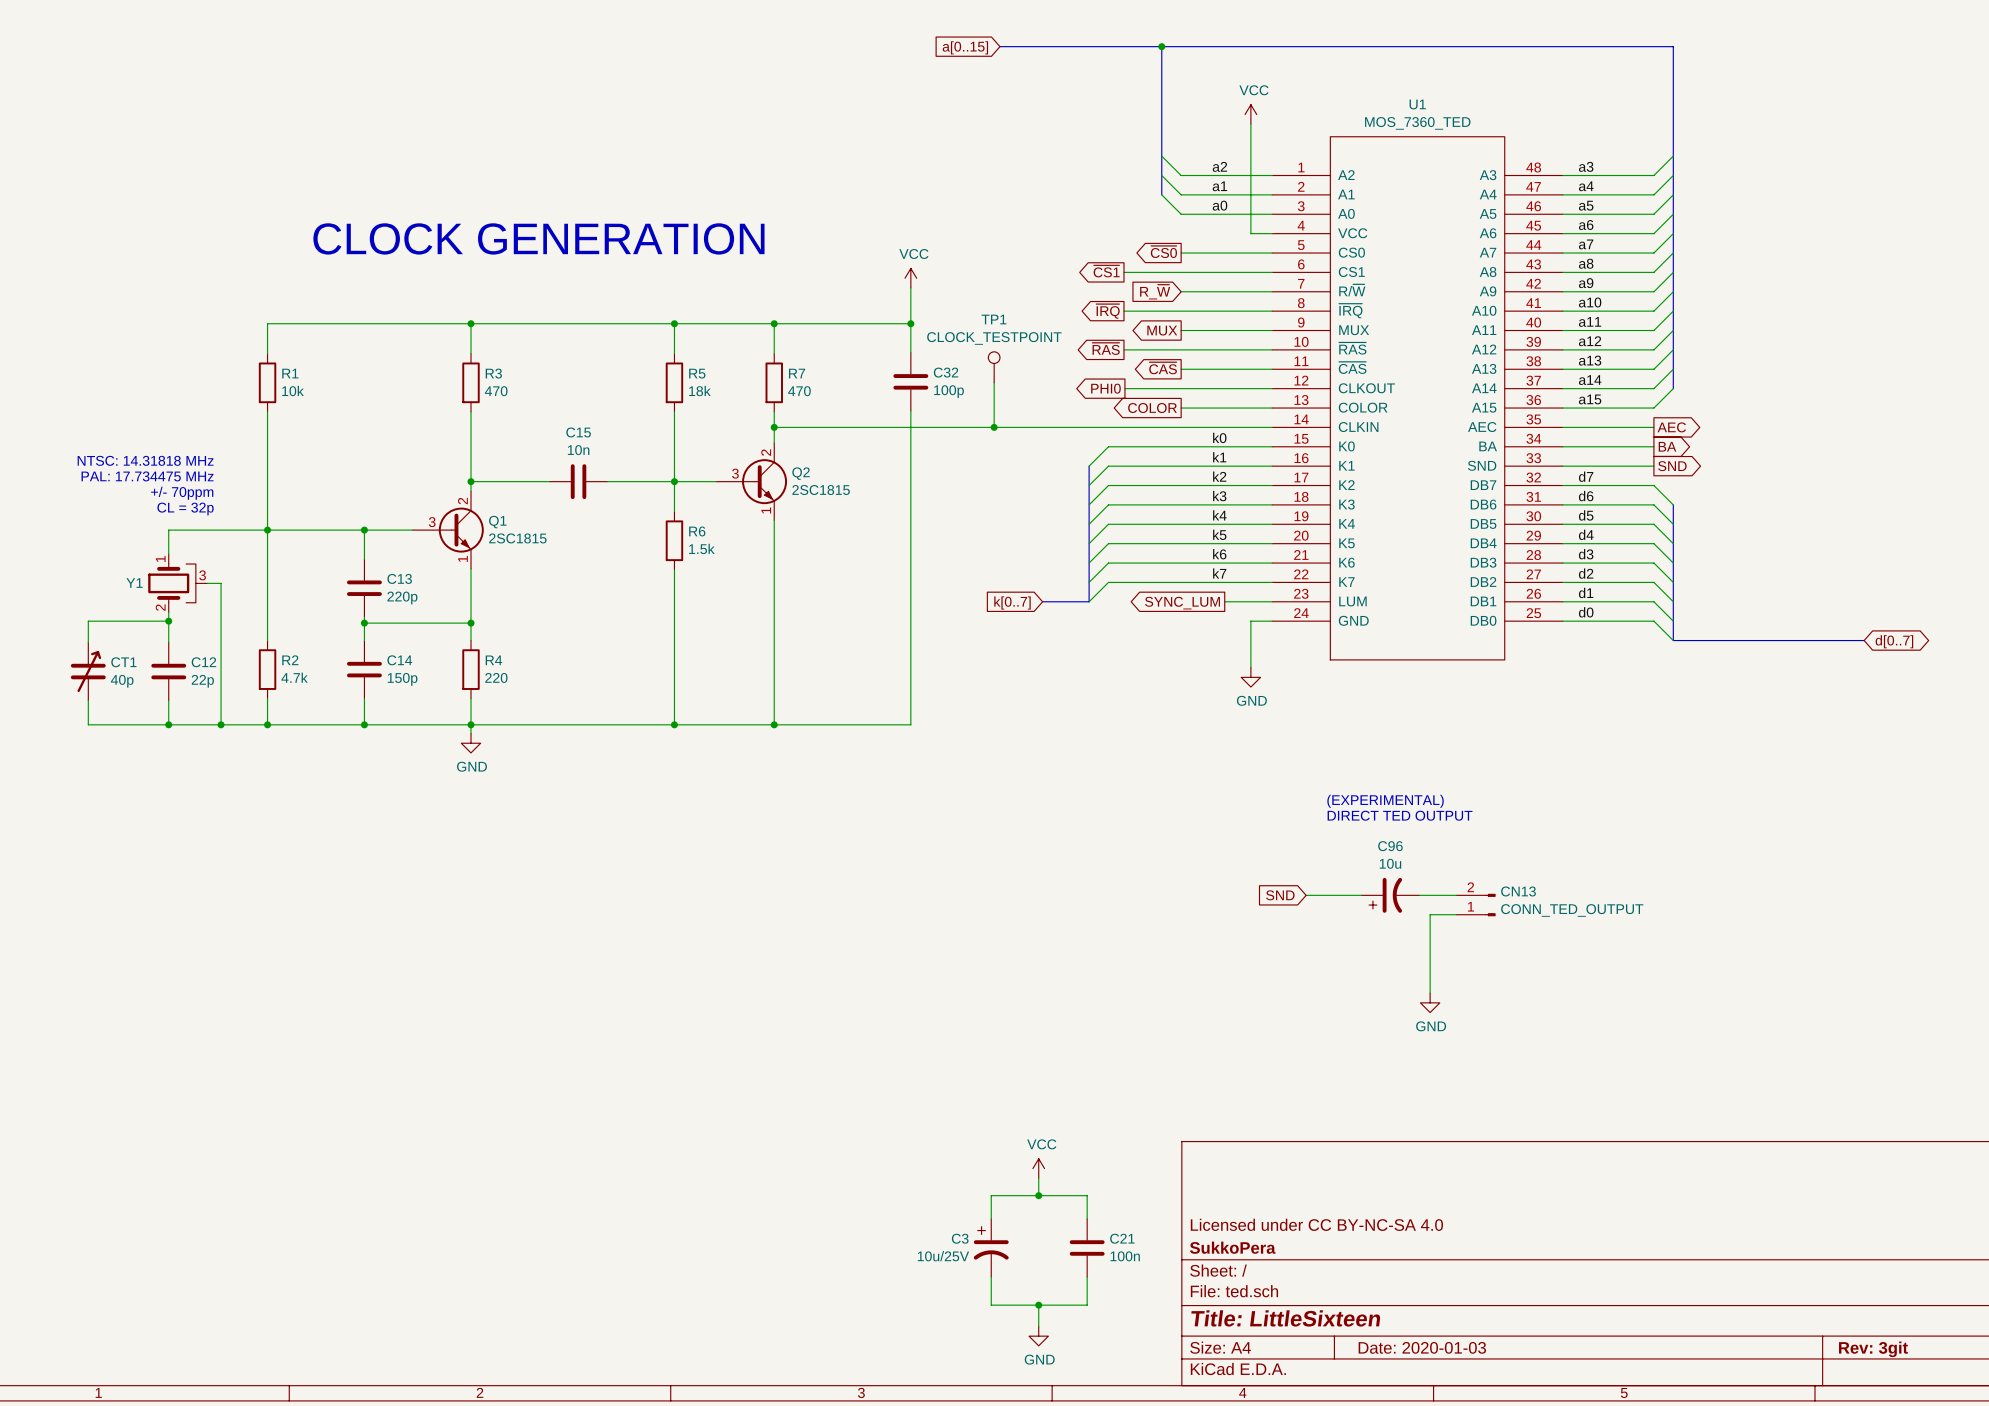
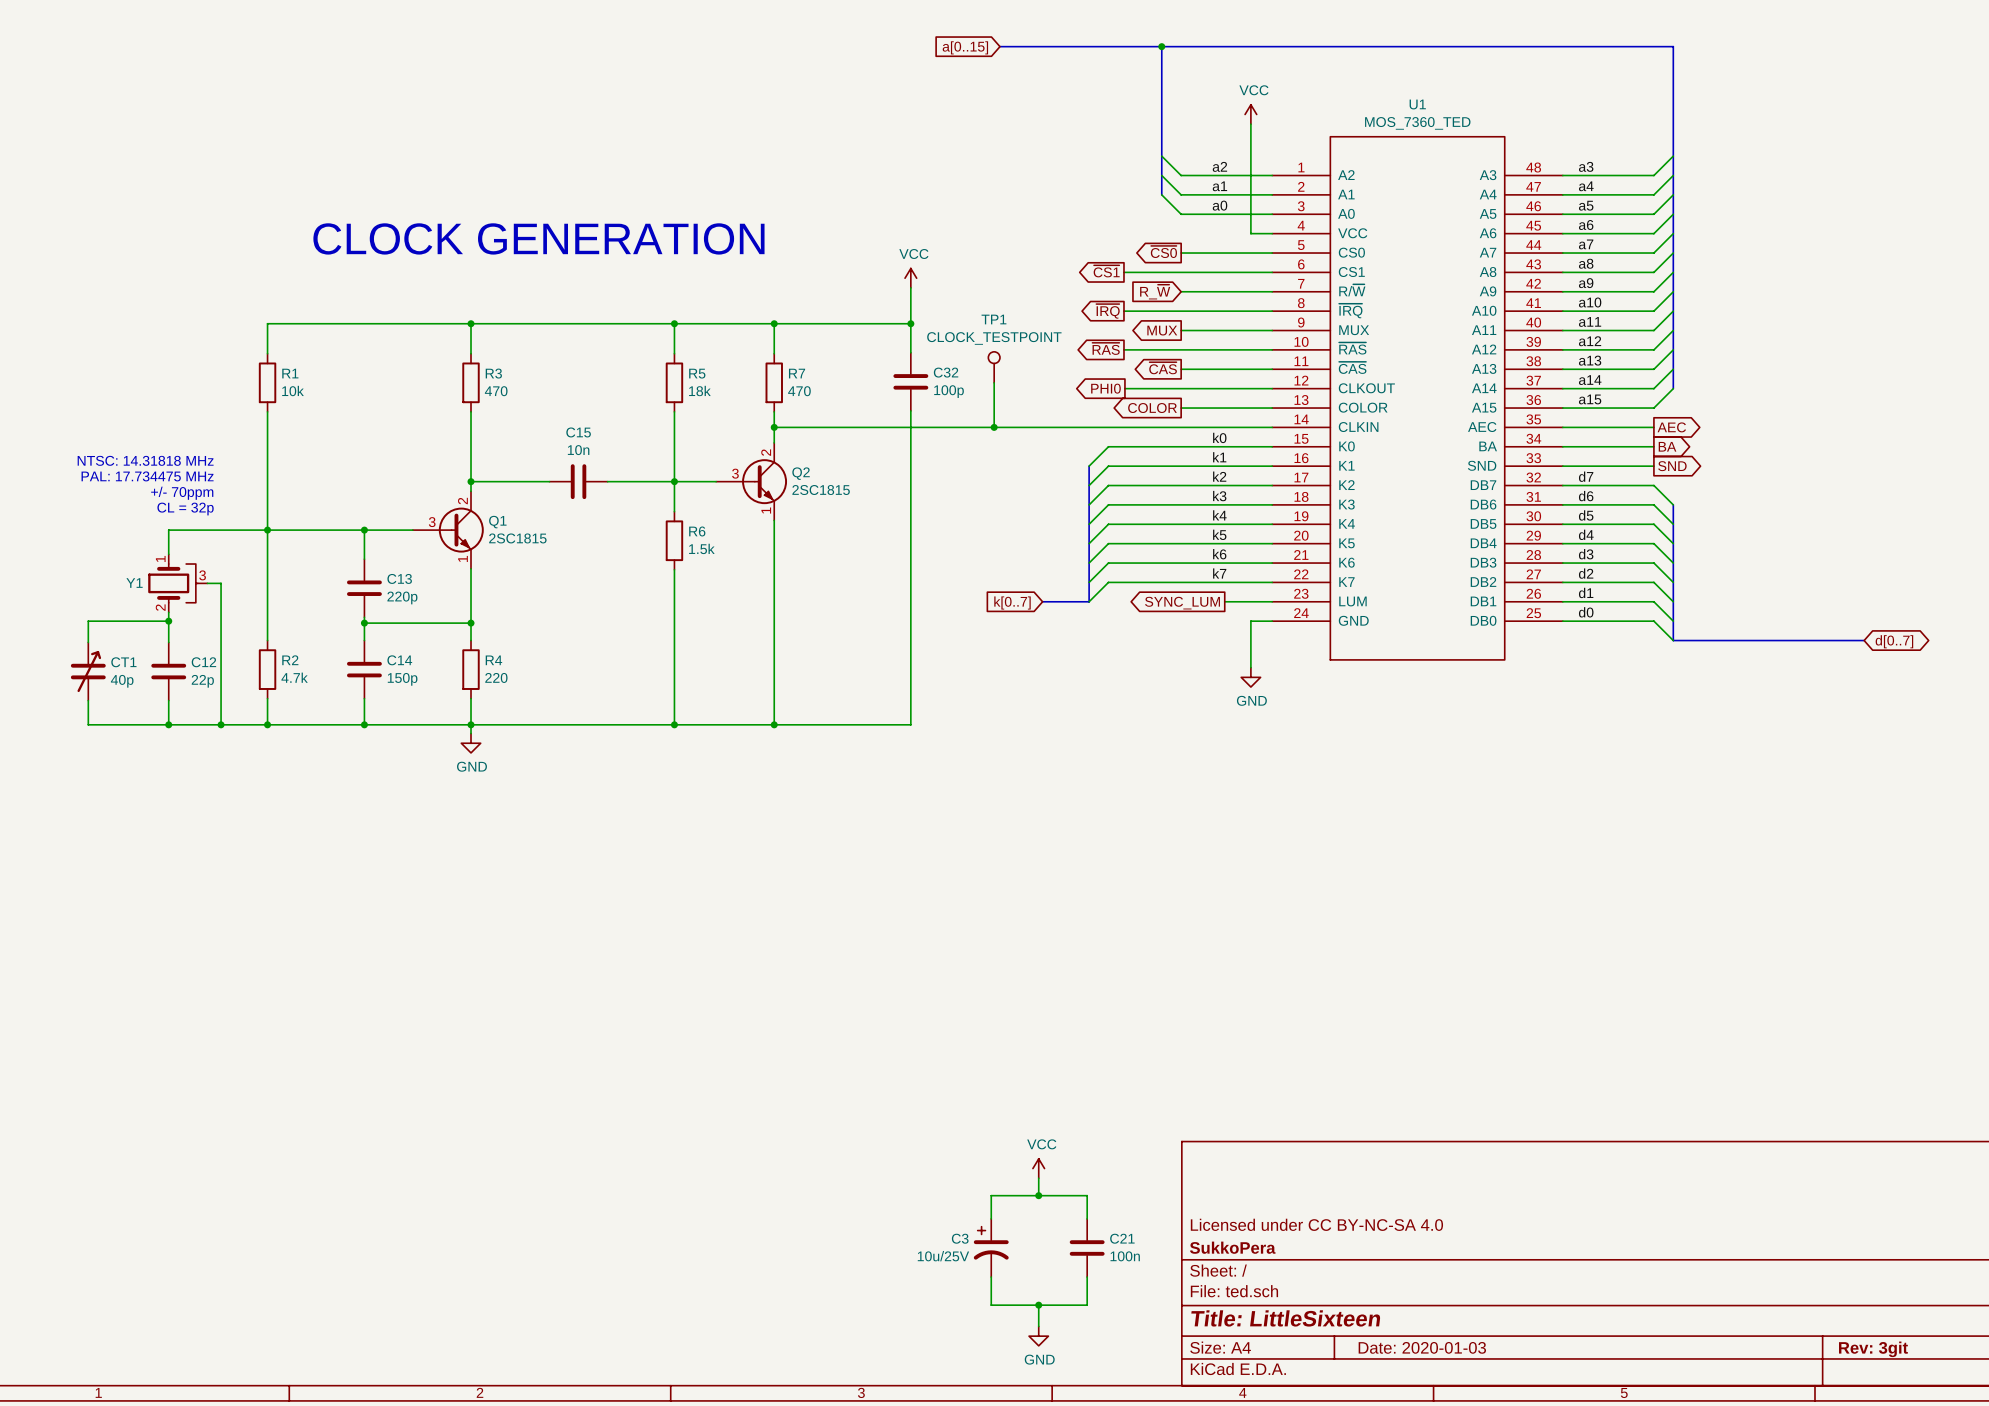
text: (EXPERIMENTAL) (1385, 801) -> none
text: DIRECT TED OUTPUT (1400, 815) -> none
global label: SND (1280, 895) -> none
wire: (1306, 895) (1361, 895) -> none
C96: 10u (1390, 895) -> none
wire: (1419, 895) (1456, 895) -> none
CN13: CONN_TED_OUTPUT (1475, 905) -> none
wire: (1456, 914) (1430, 914) (1430, 993) -> none
power symbol: GND (1430, 1002) -> none

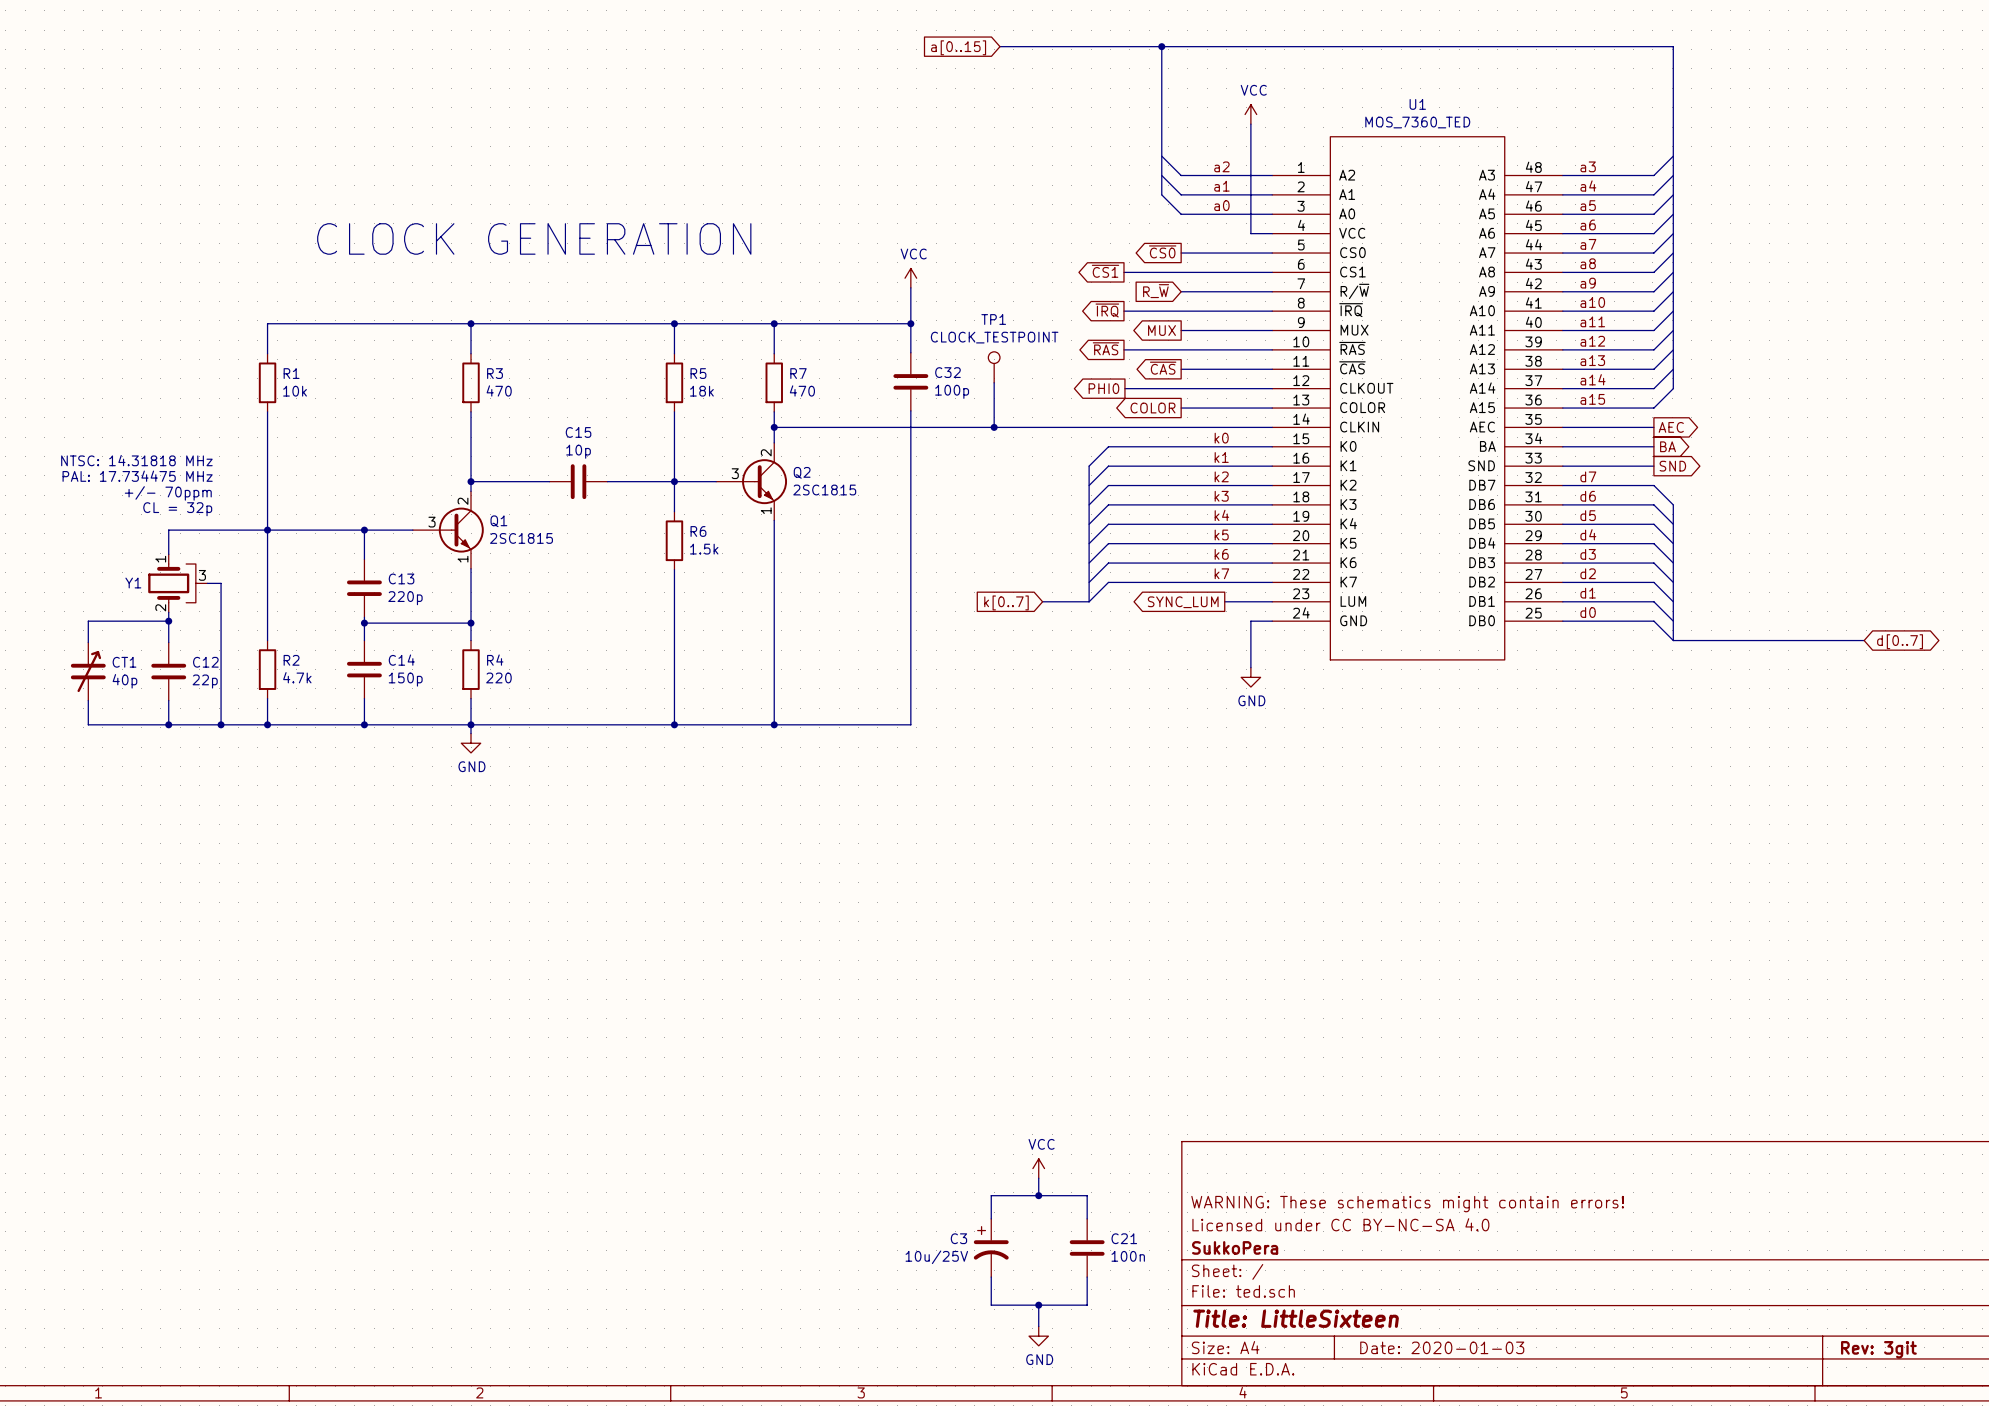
C15 value: 10n (578, 450) -> 10p (578, 451)
title block: none -> WARNING: These schematics might contain errors! (1407, 1204)

